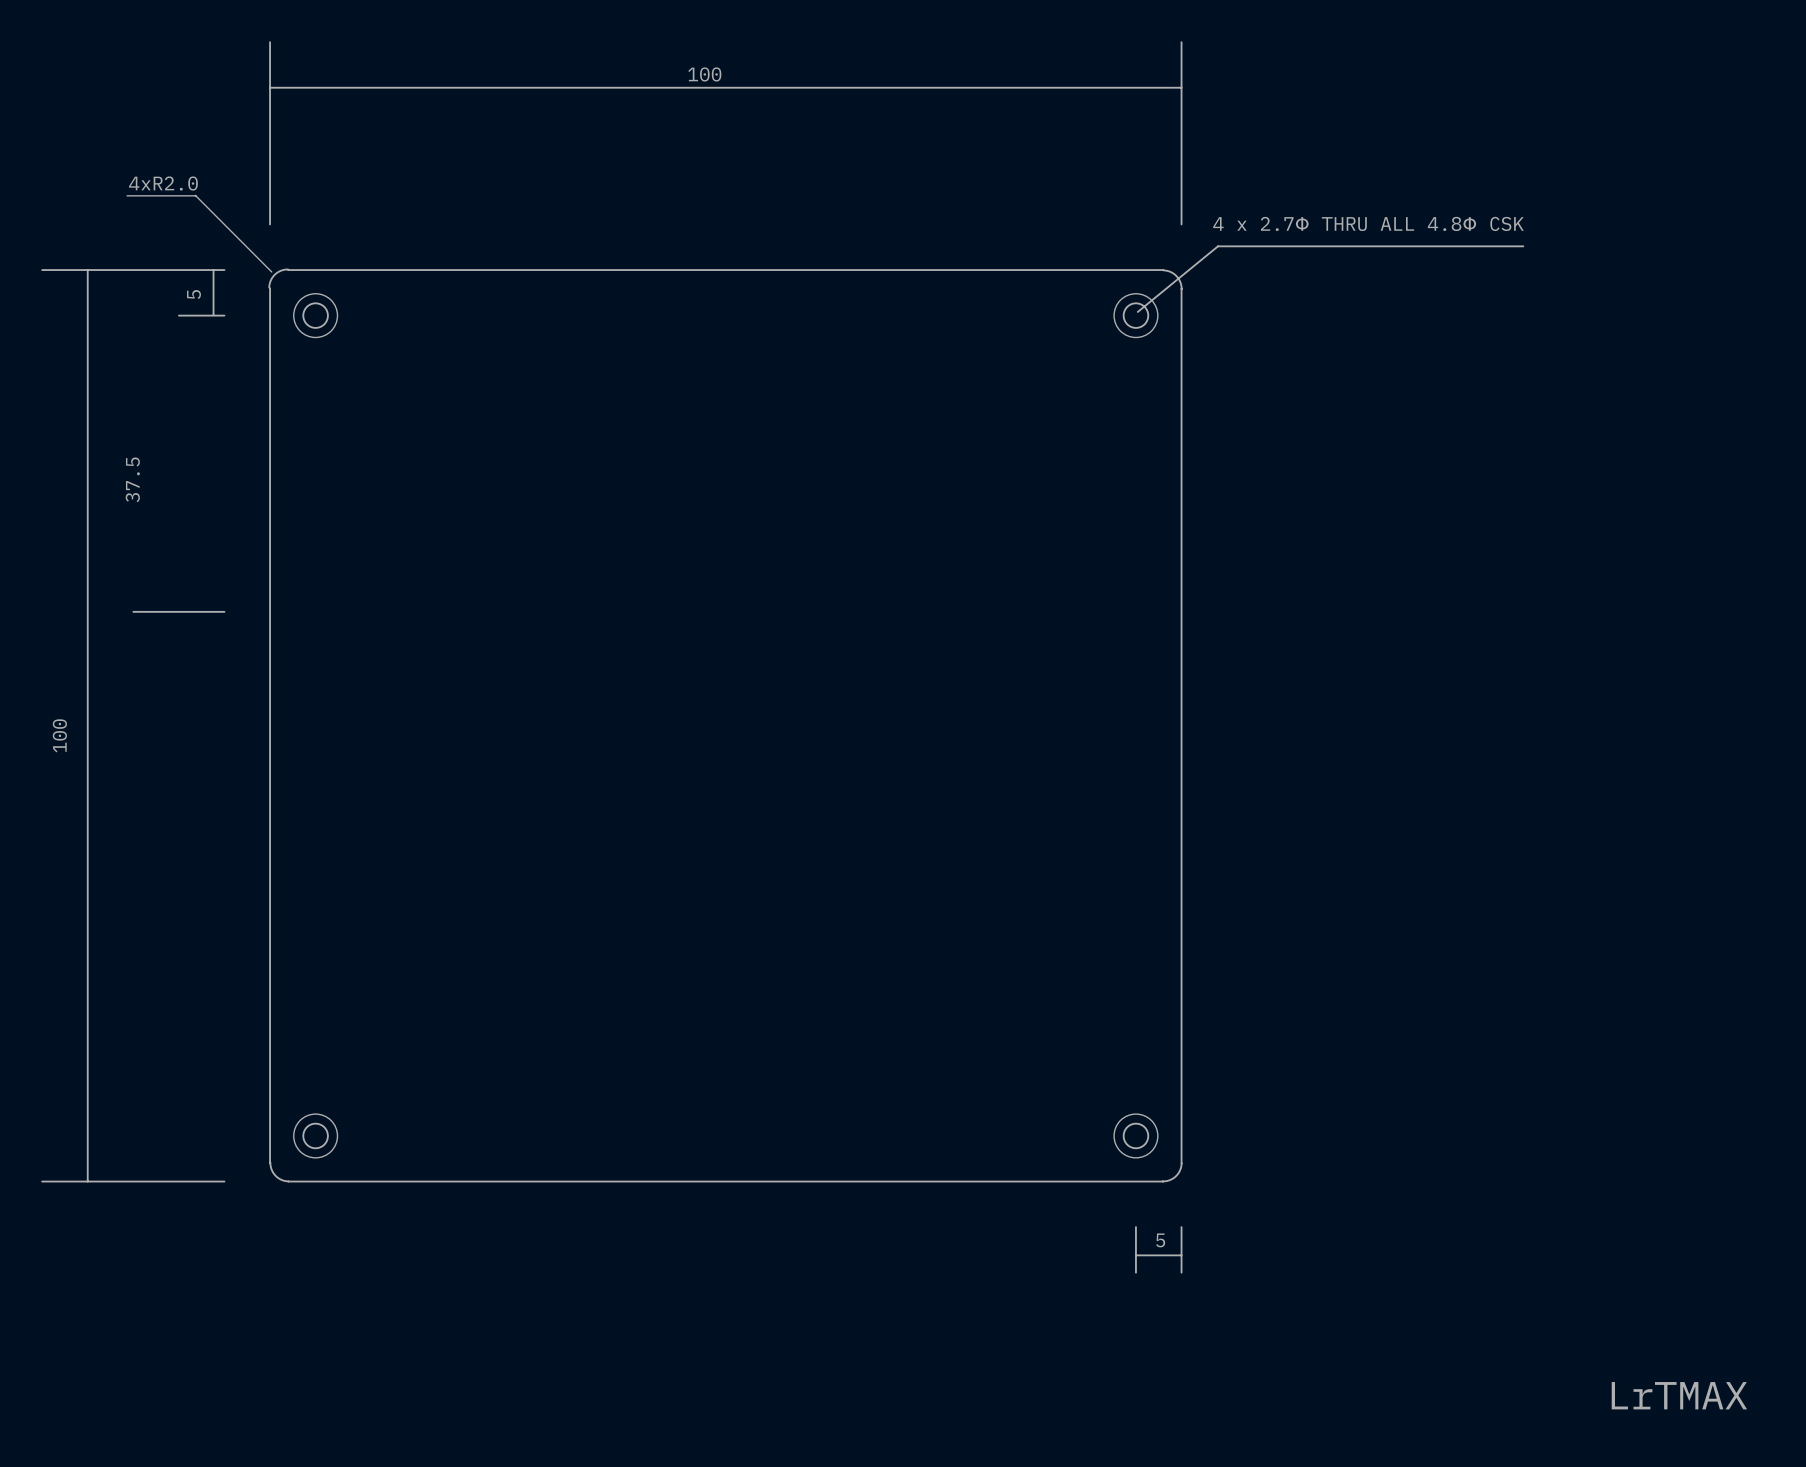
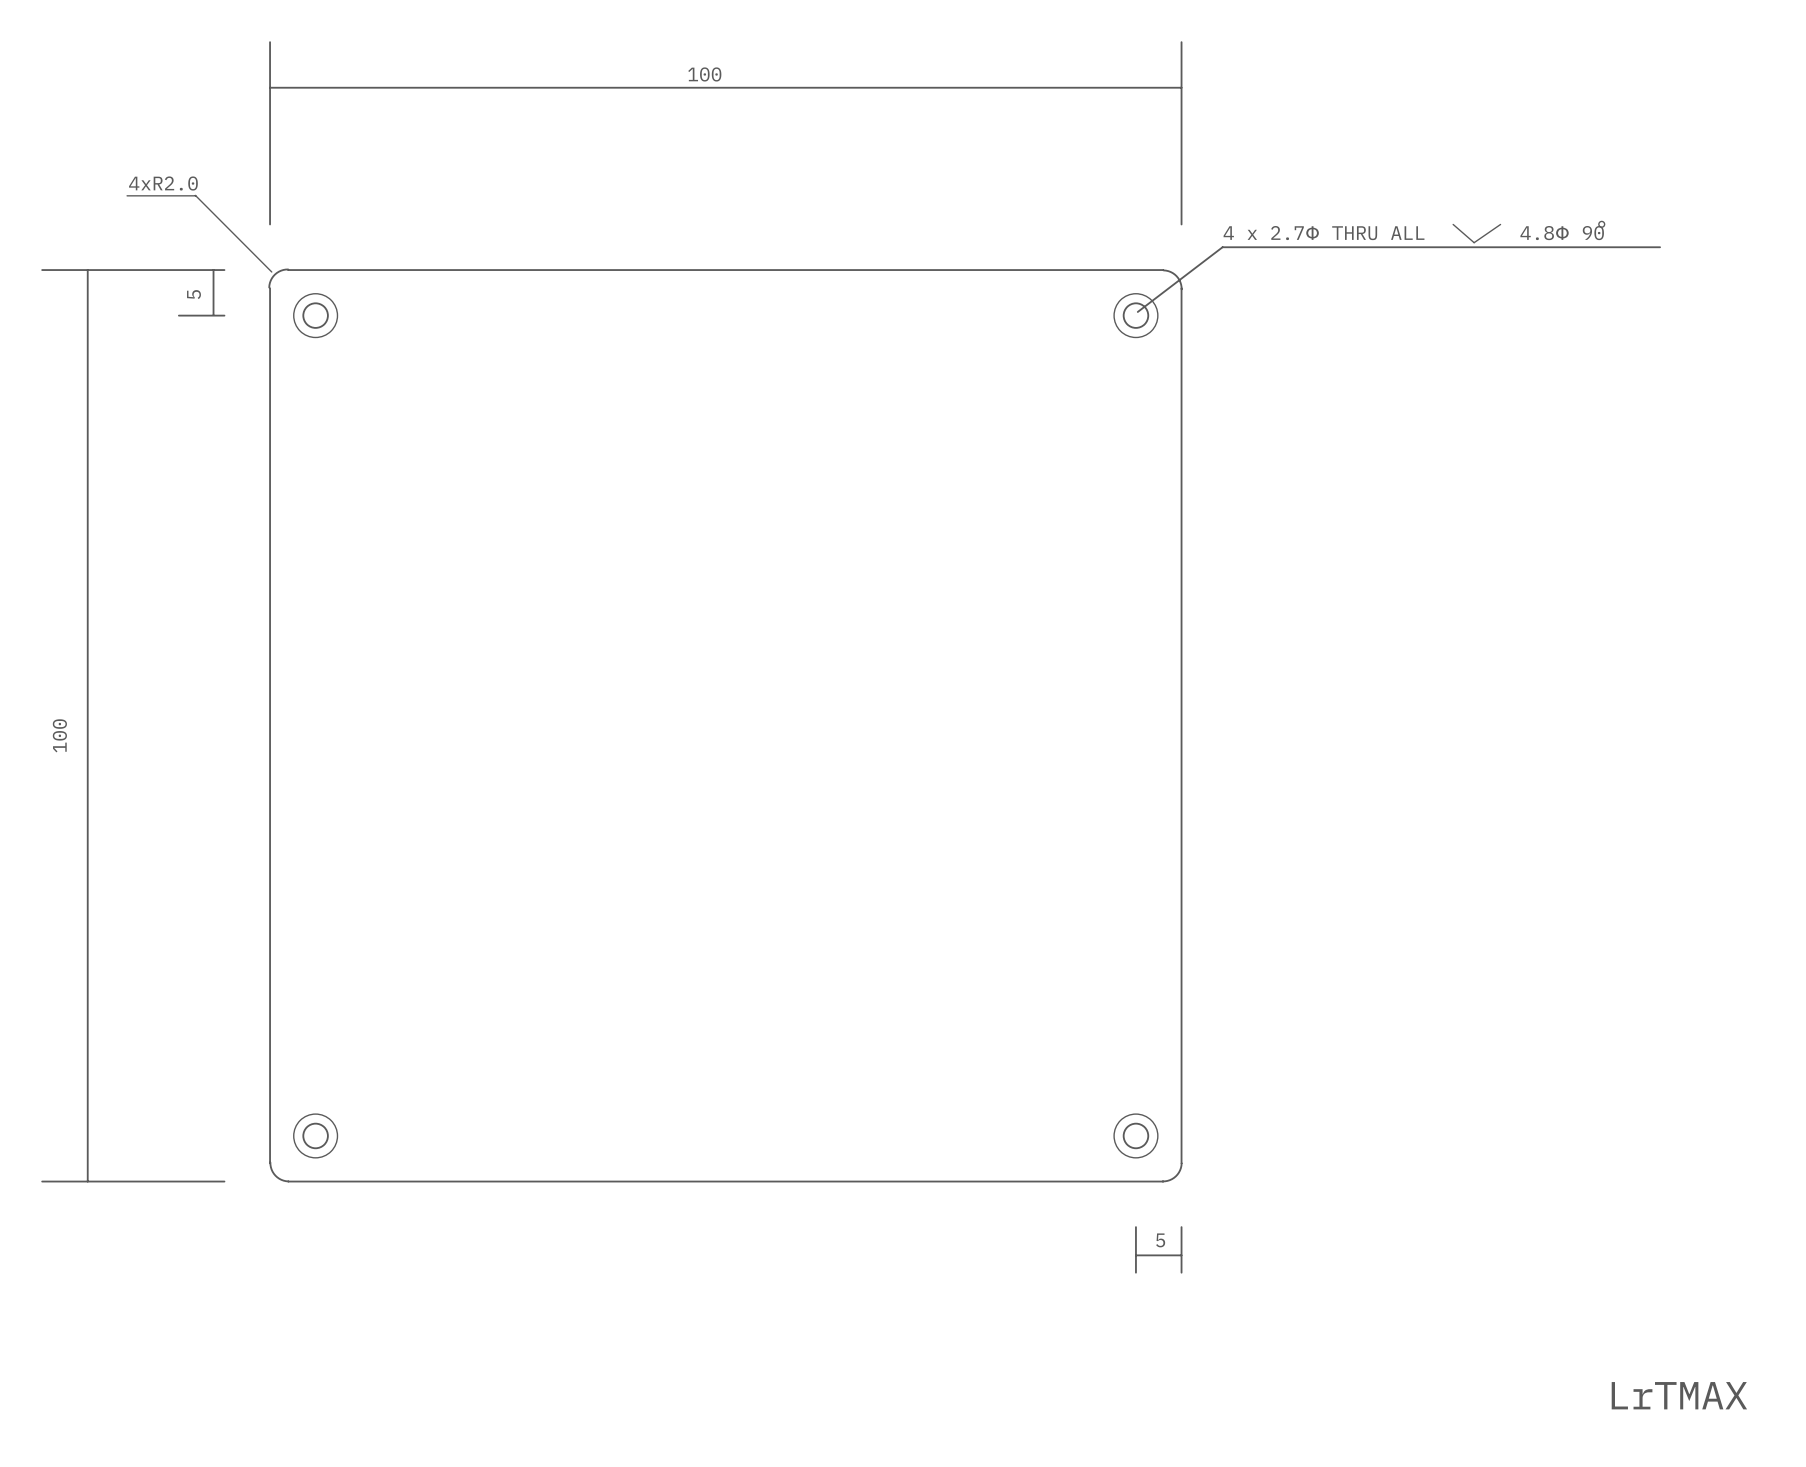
drawing: none -> [1598, 220, 1606, 228]
text: 4 x 2.7Φ THRU ALL 4.8Φ CSK (1368, 223) -> 4 x 2.7Φ THRU ALL 4.8Φ 90 (1413, 233)
line: none -> (1453, 224) (1474, 242) (1500, 224)
line: (1523, 246) (1218, 246) (1137, 311) -> (1660, 247) (1222, 247) (1137, 311)
text: 37.5 (132, 479) -> none
line: (133, 611) (224, 611) -> none

